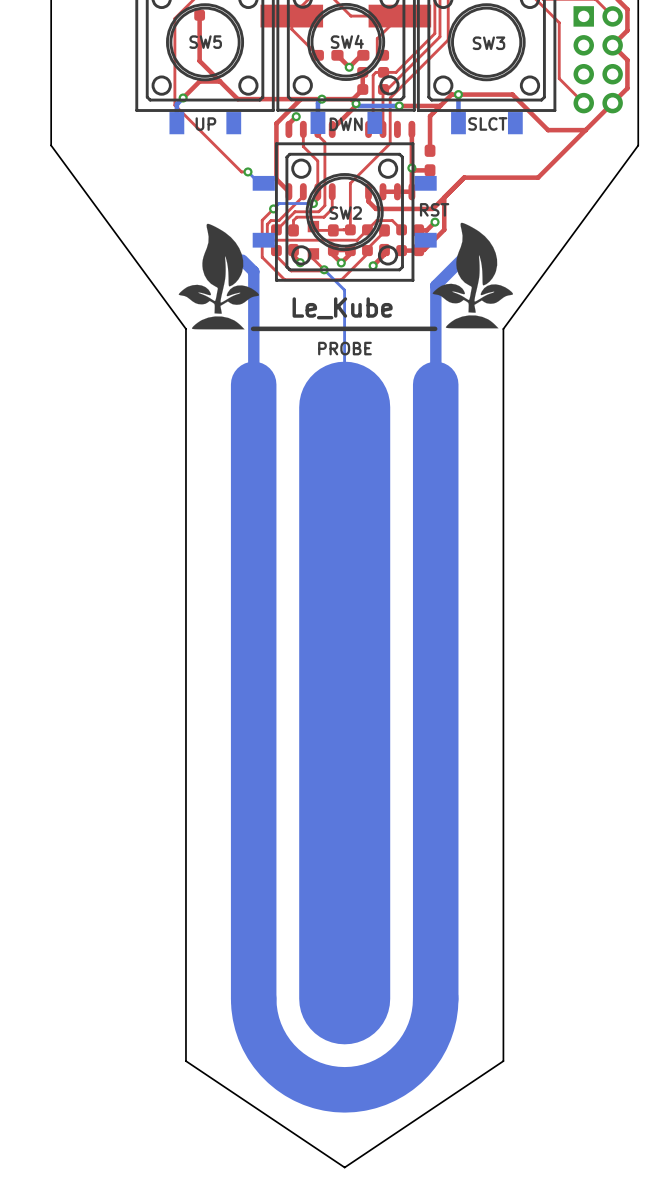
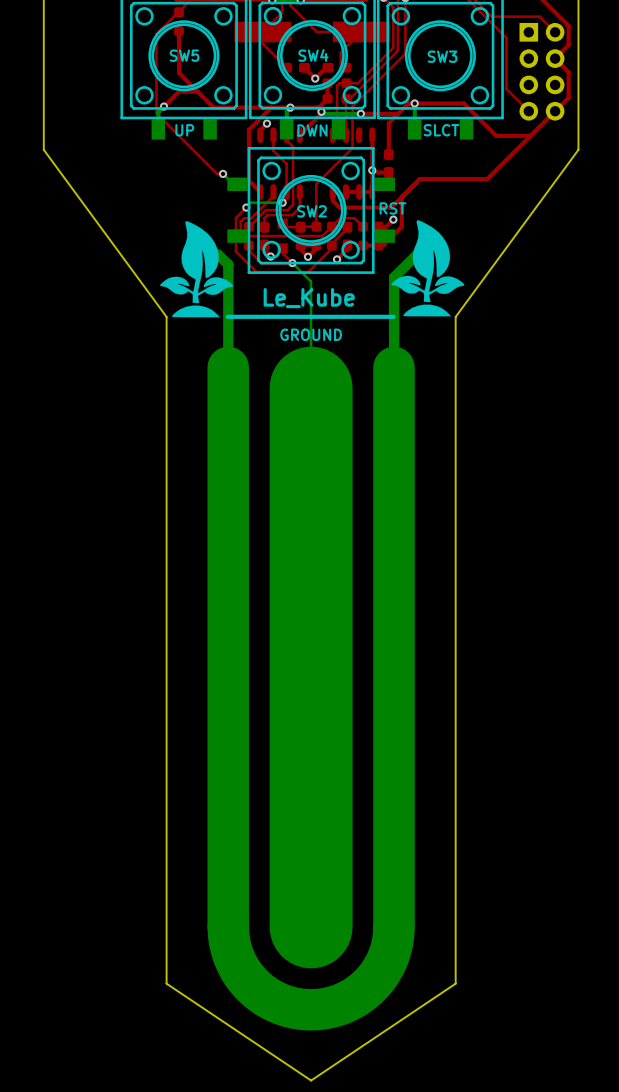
part value: PROBE (344, 348) -> GROUND (311, 334)

